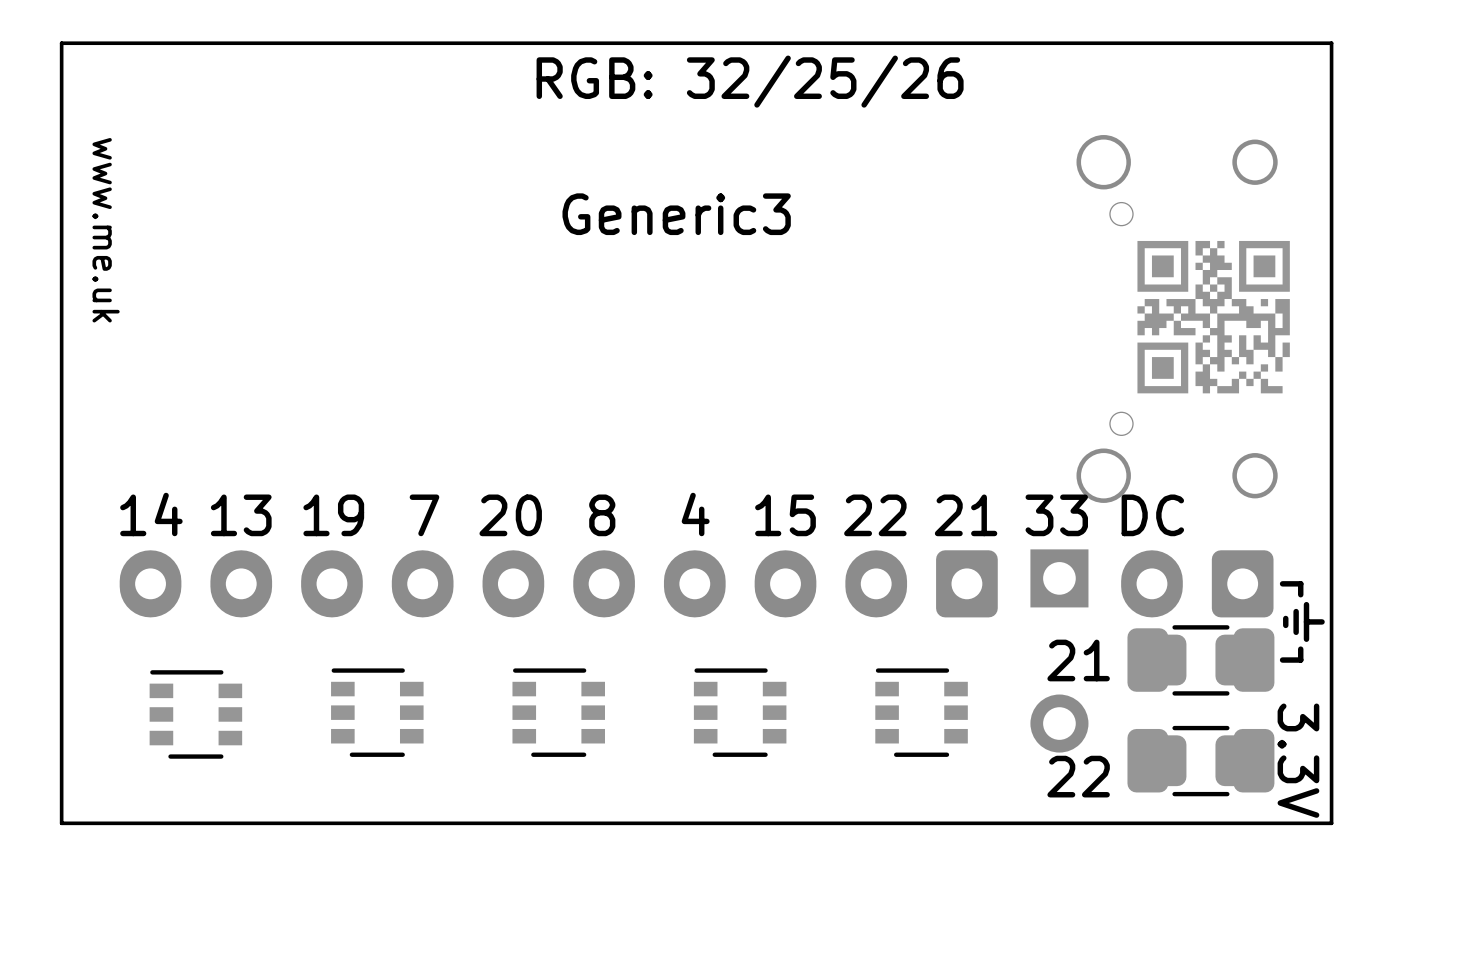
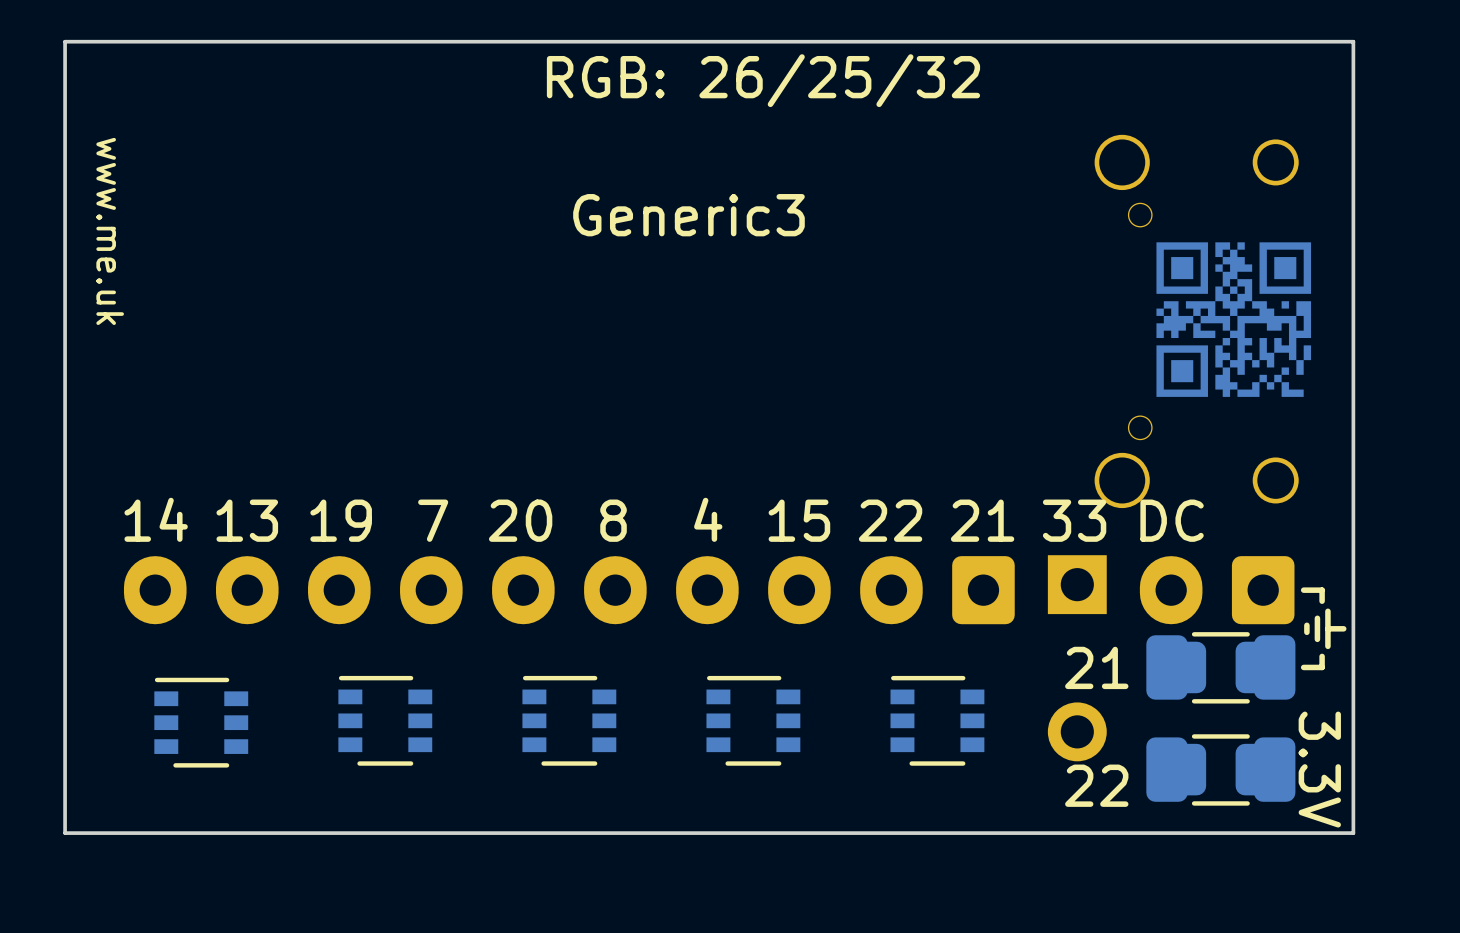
text: RGB: 32/25/26 (750, 81) -> RGB: 26/25/32 (763, 80)

